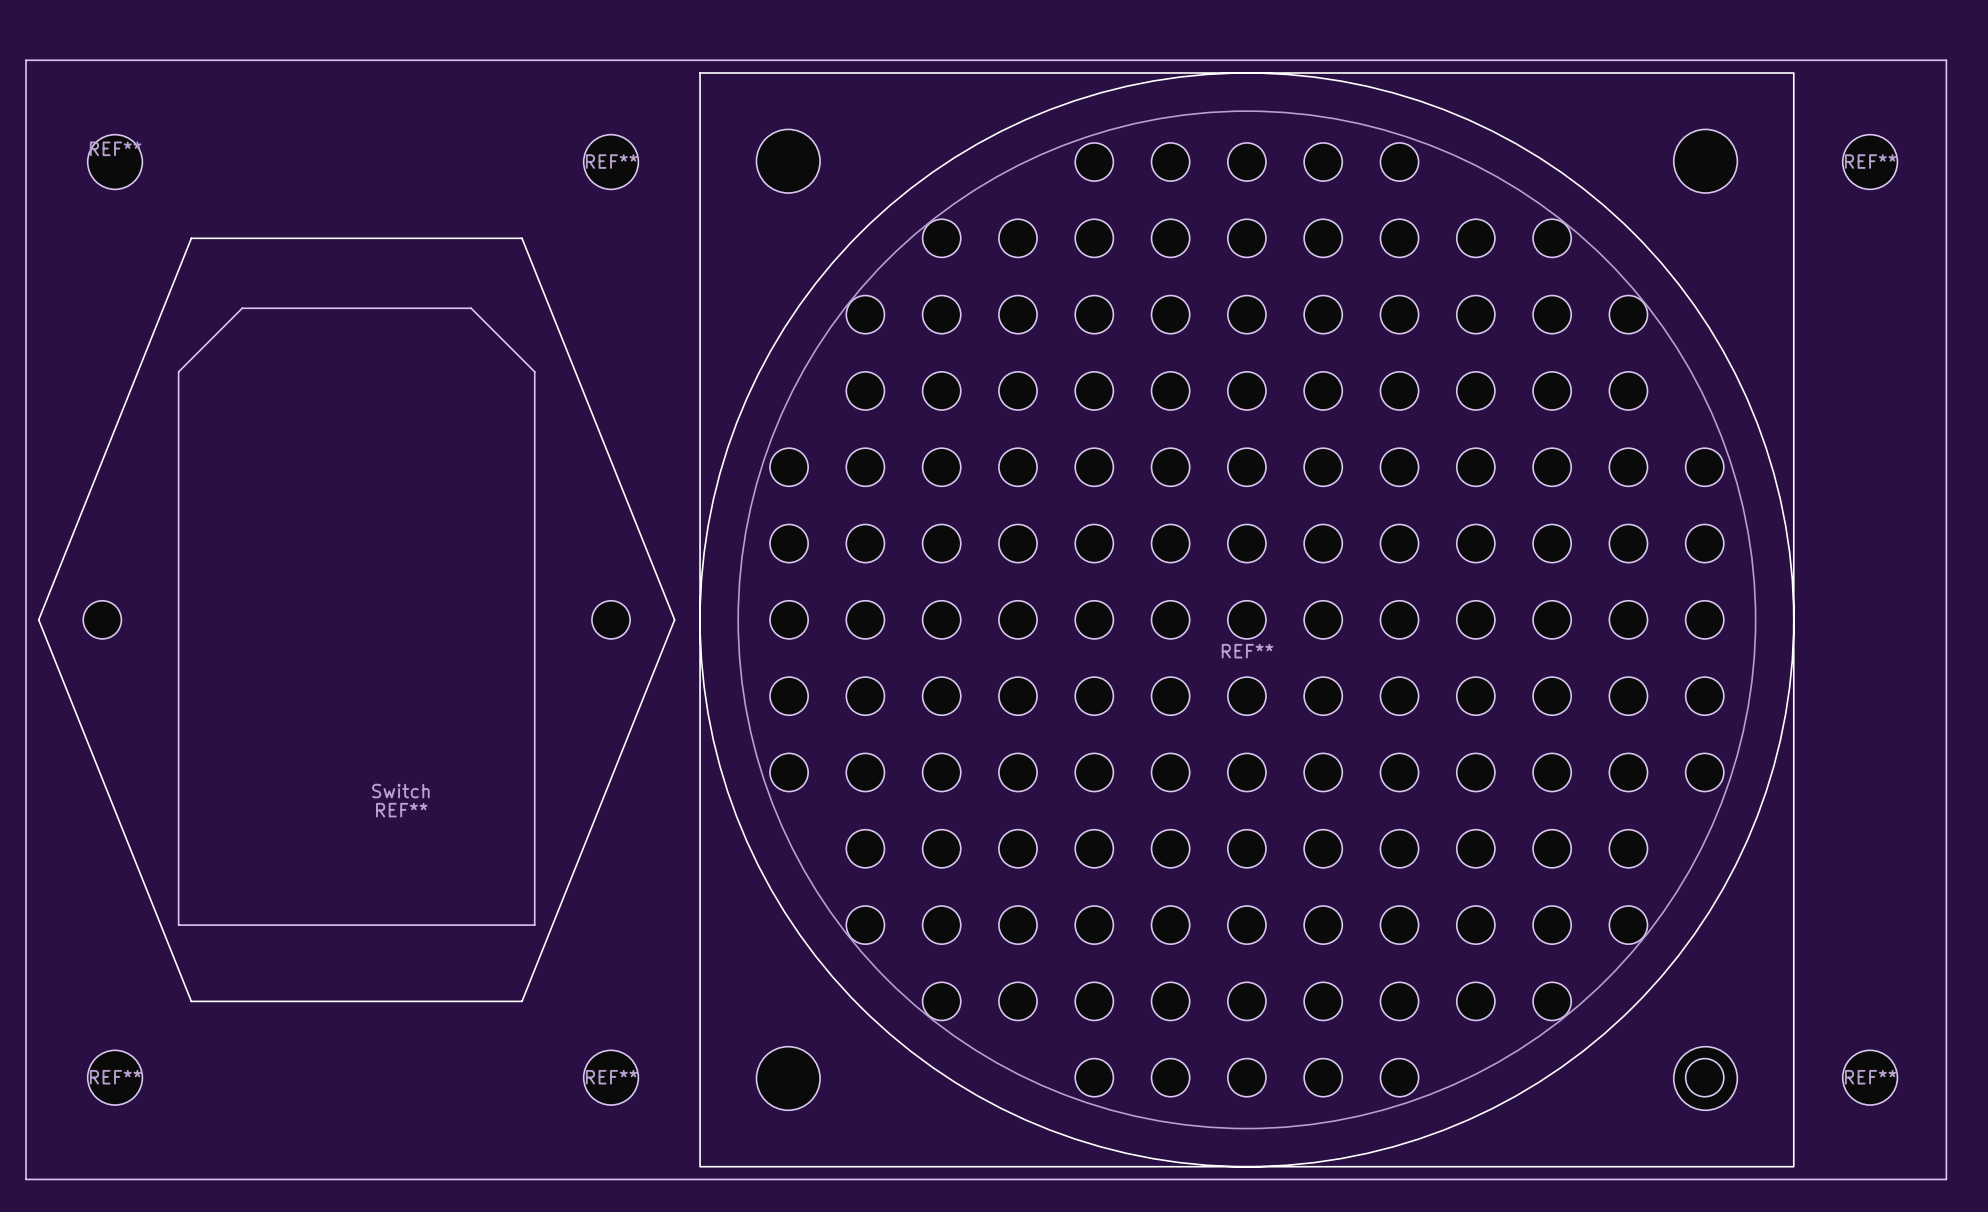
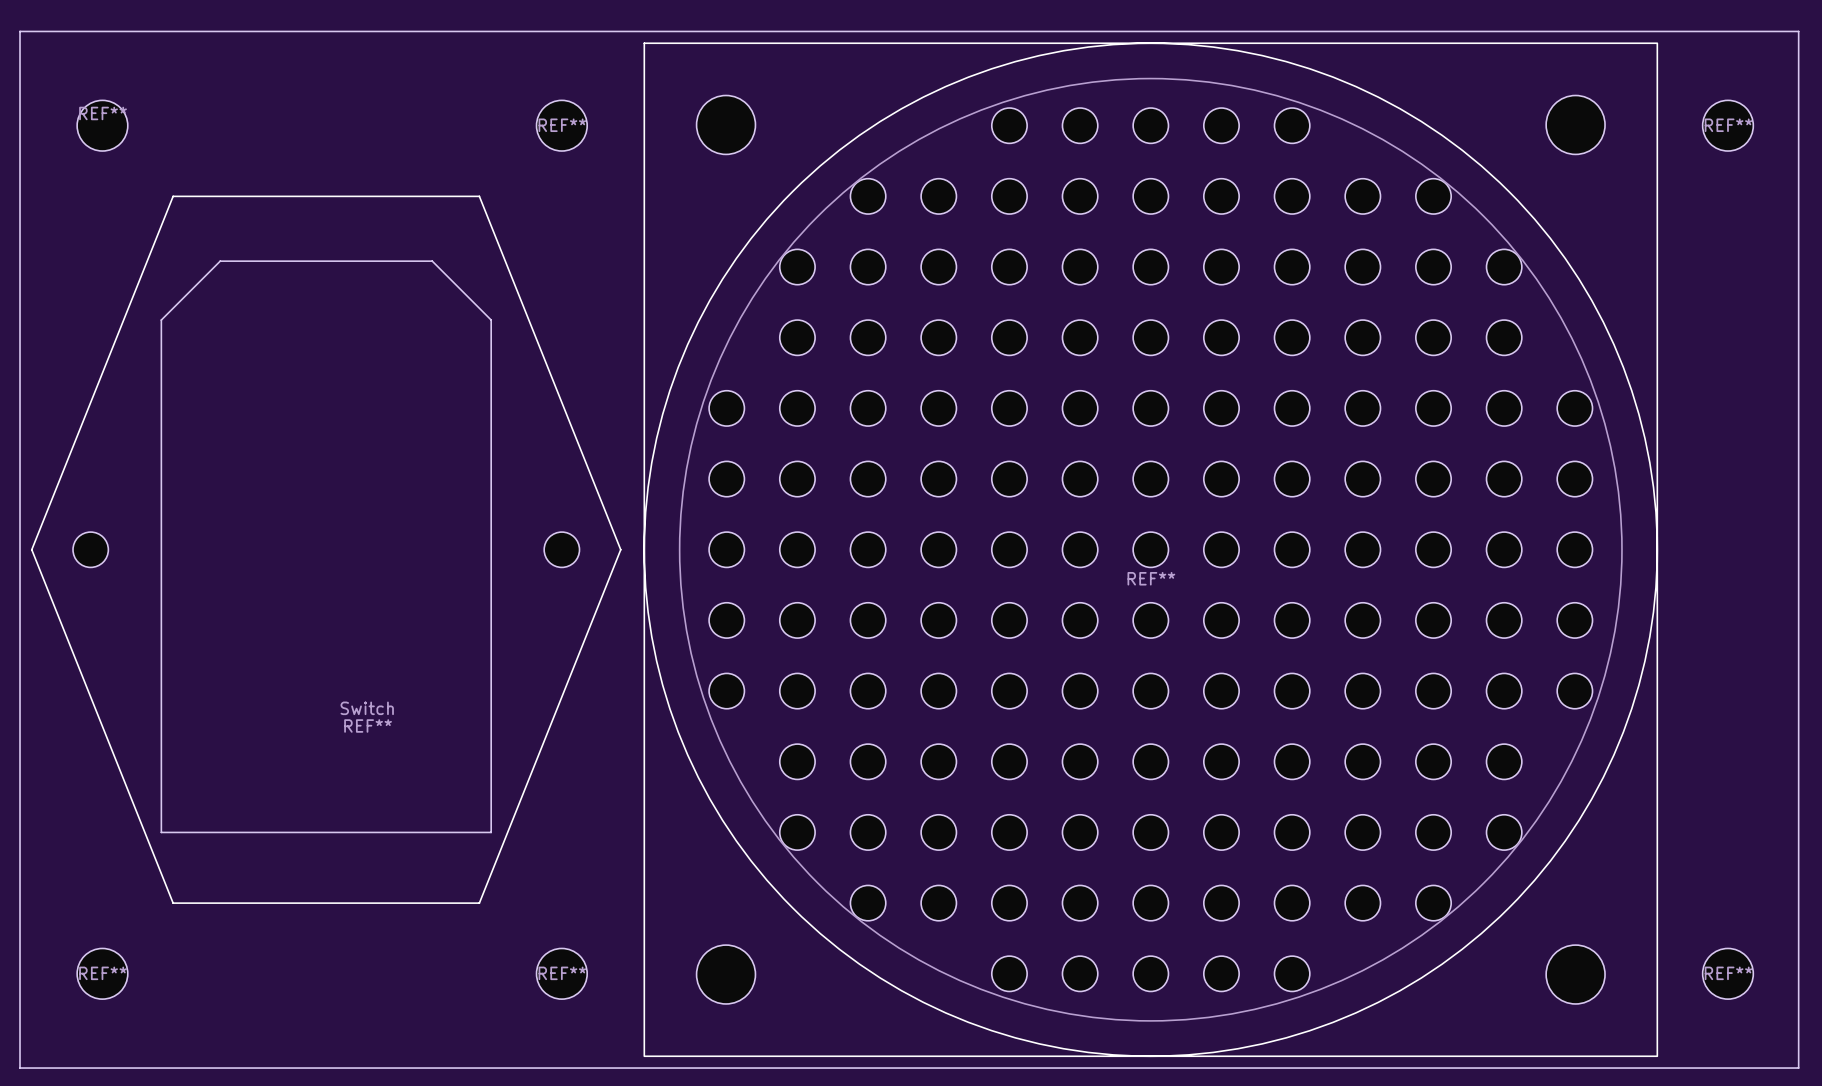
REF** footprint: [699, 72, 1795, 1168] -> [643, 42, 1658, 1057]

